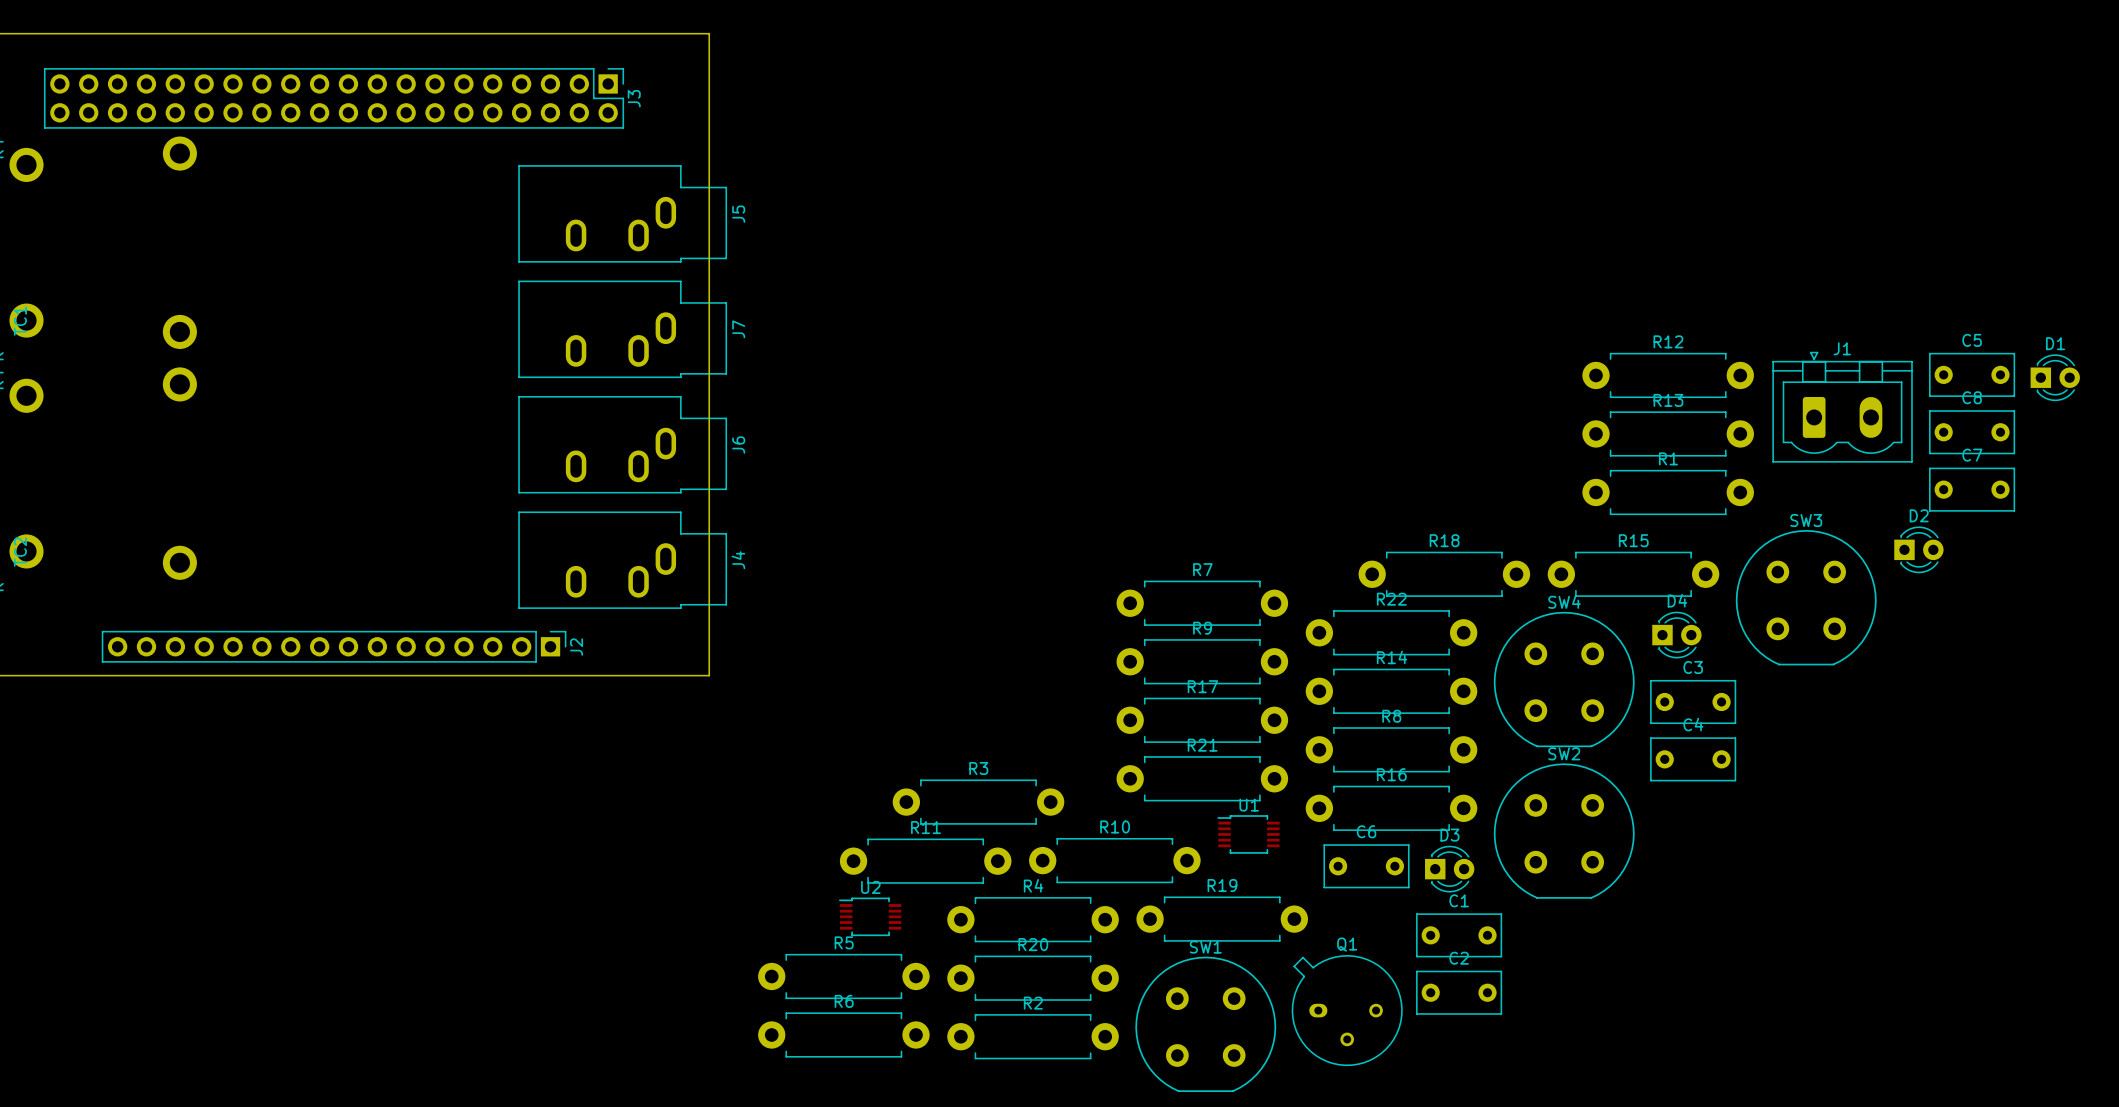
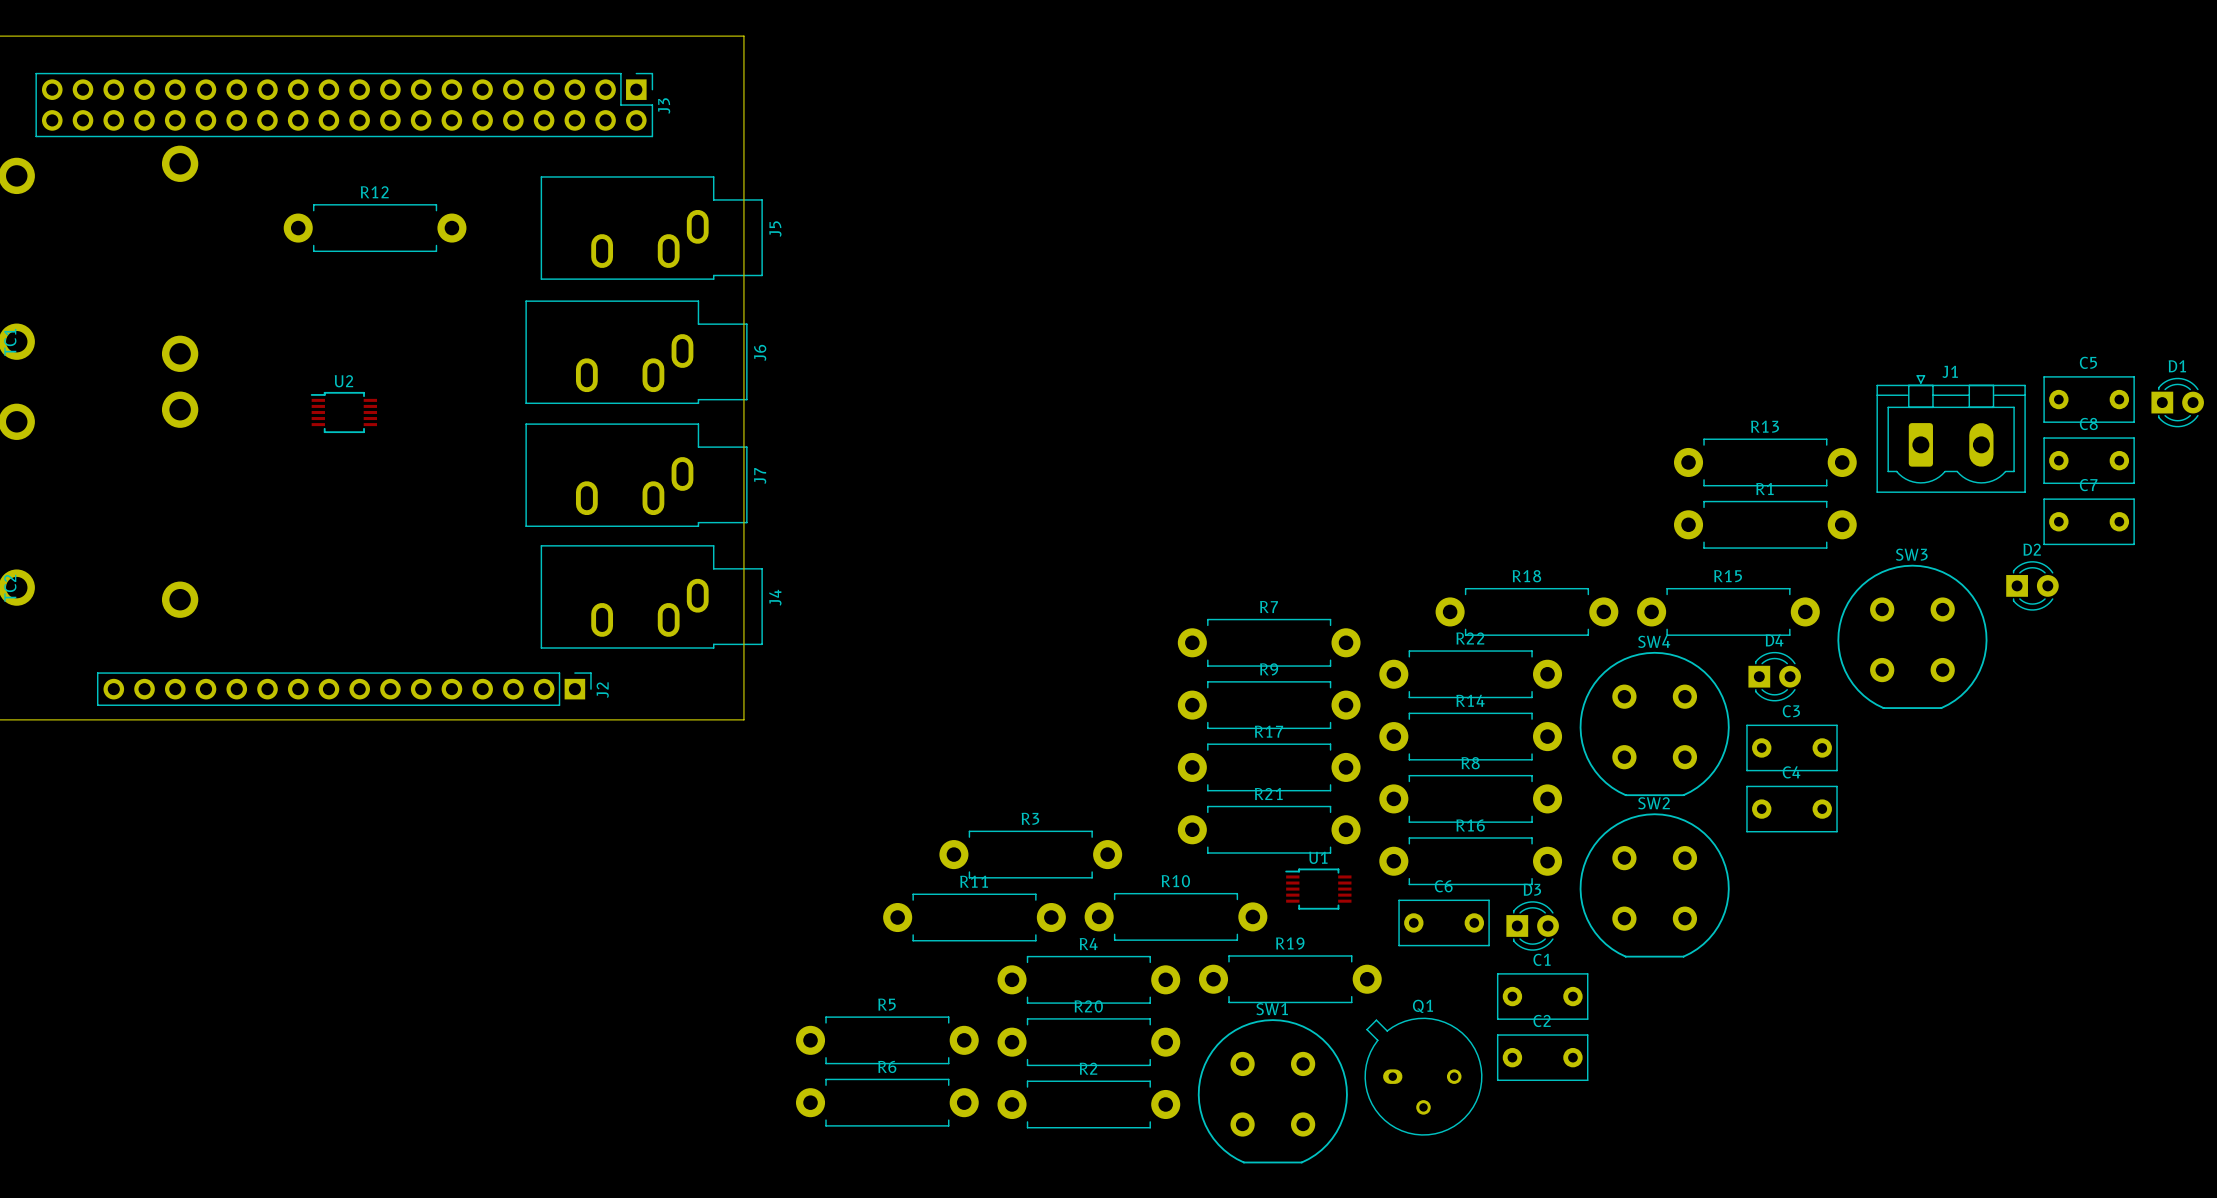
J7 position: (622, 329) -> (636, 475)
R12 position: (1668, 375) -> (375, 228)
J6 position: (622, 444) -> (636, 352)
U2 position: (870, 916) -> (343, 412)

